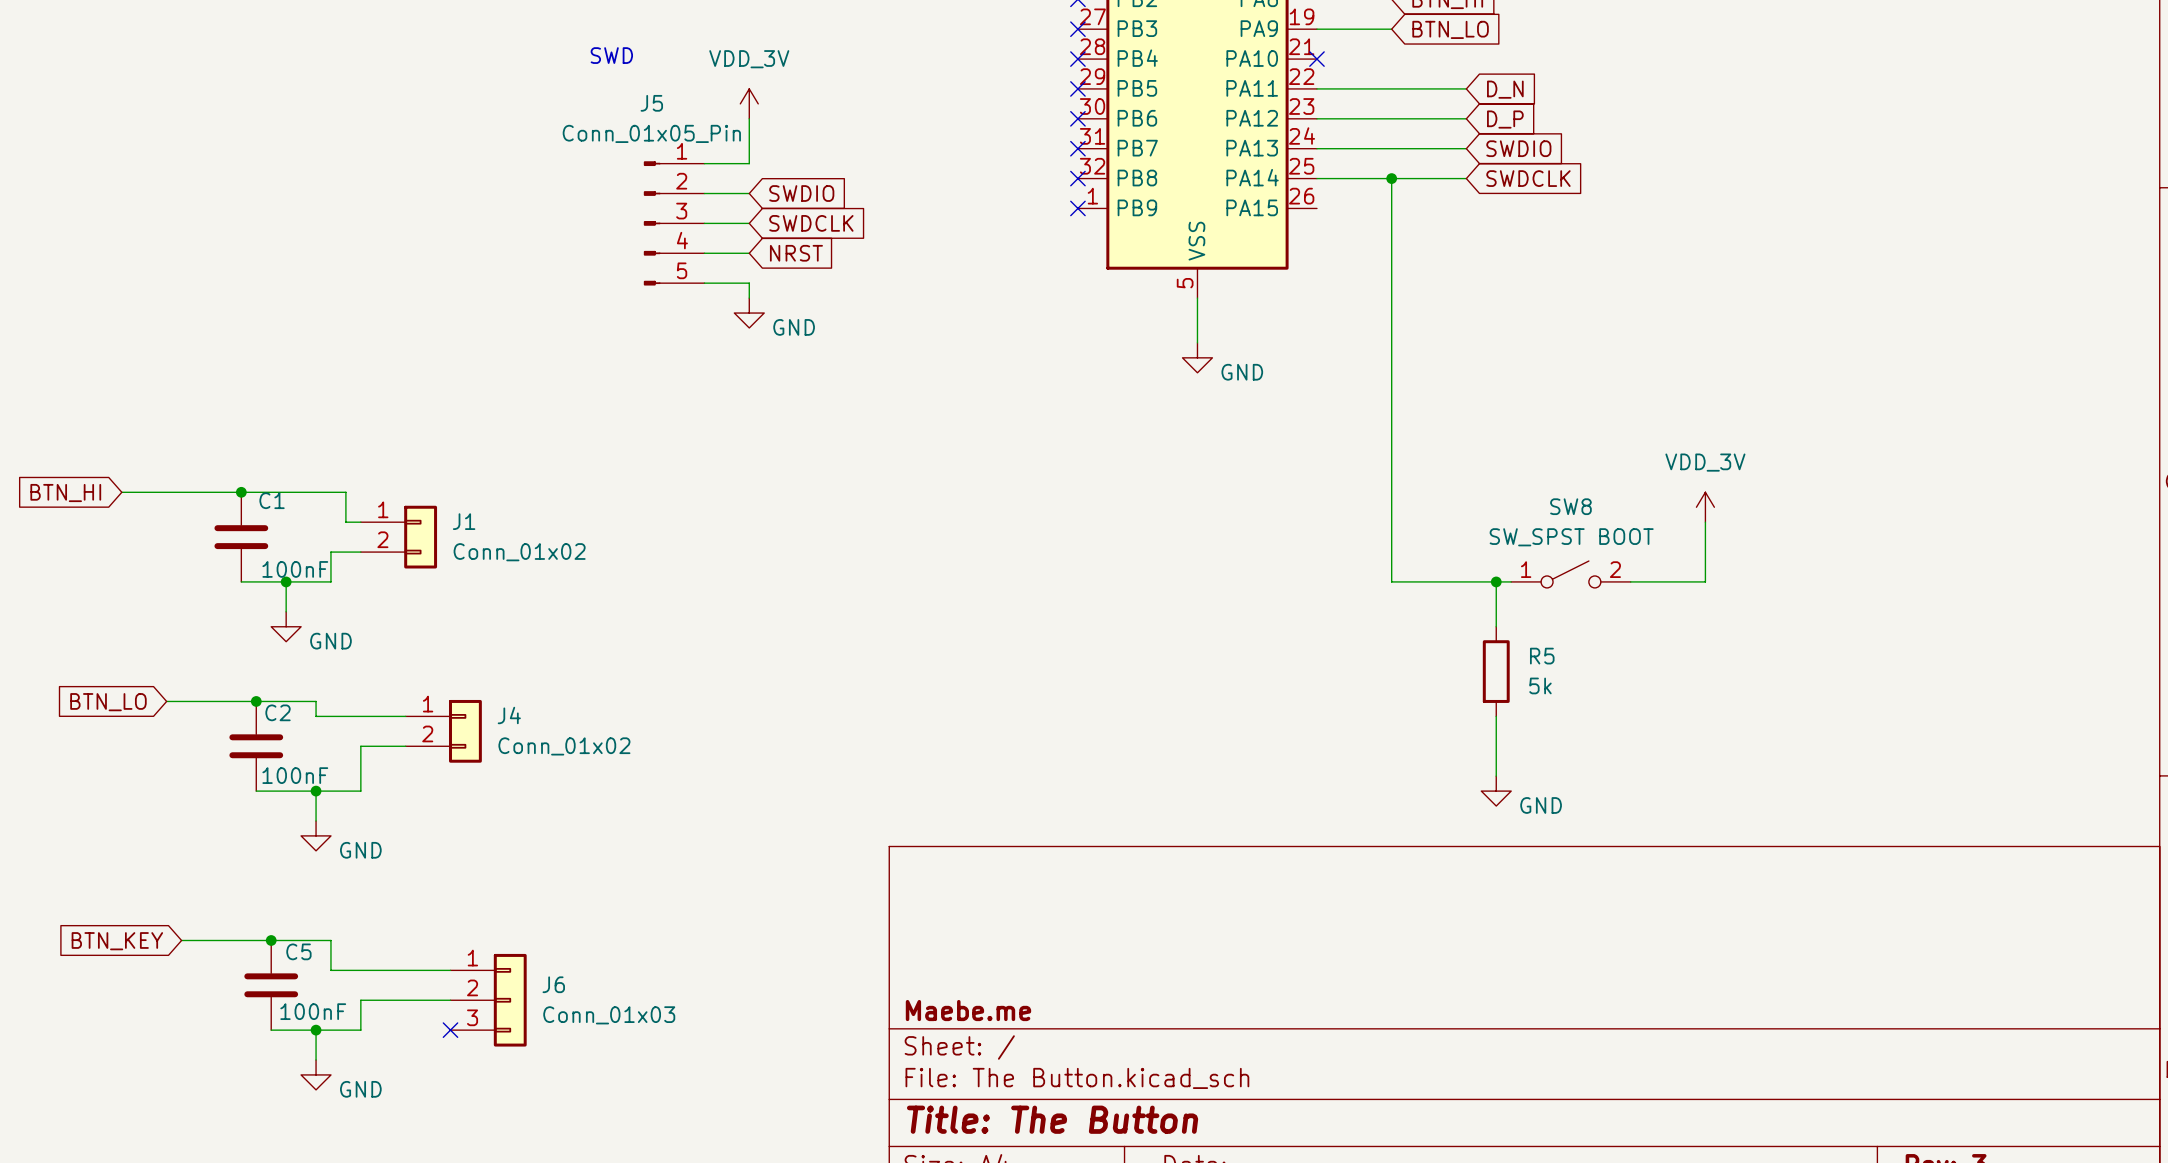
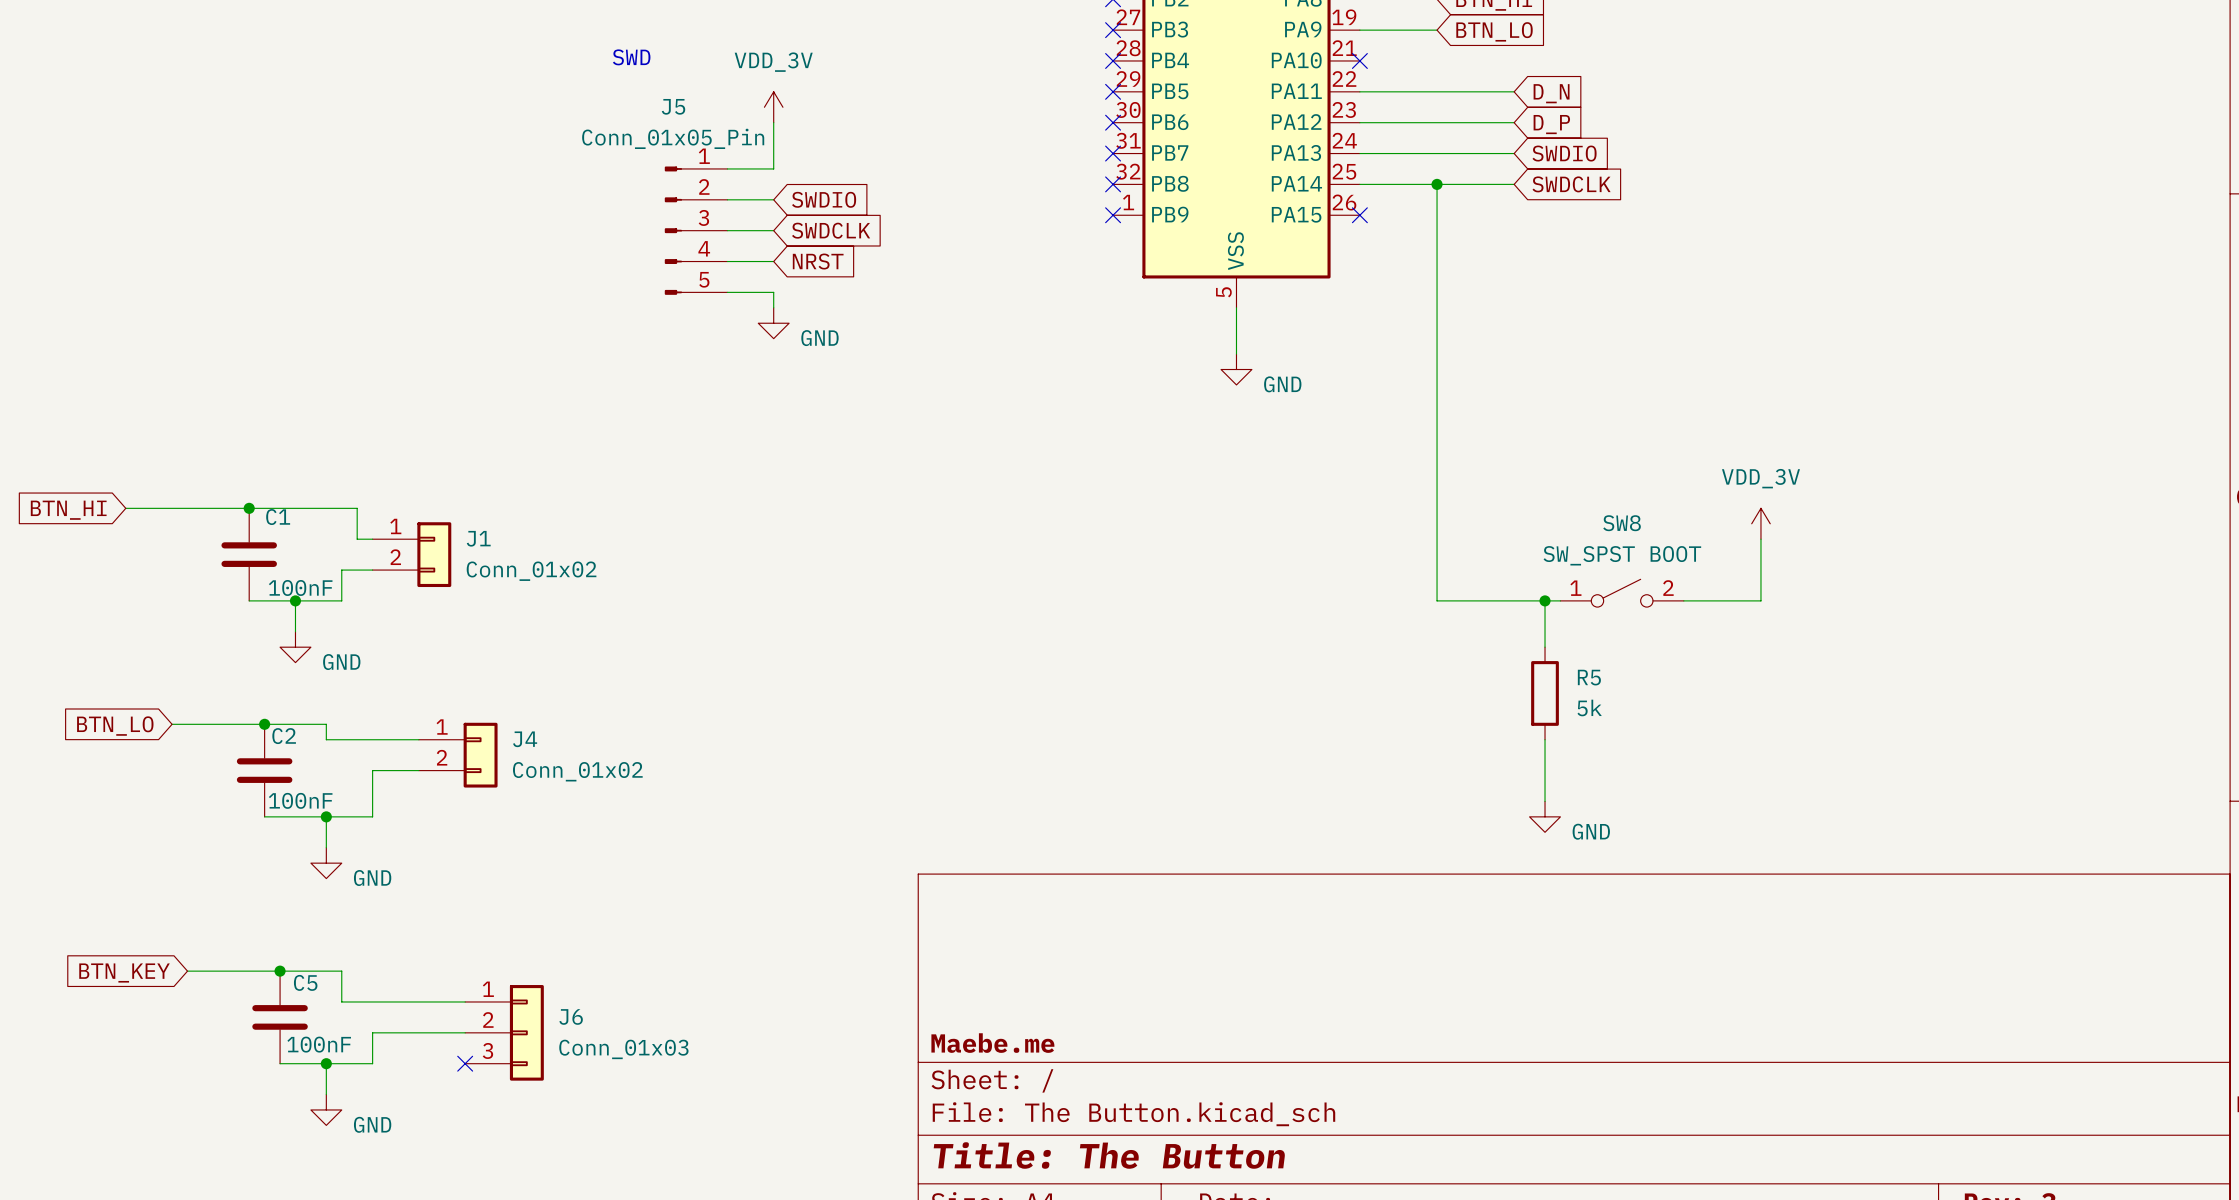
no-connect mark: none -> (1359, 215)

